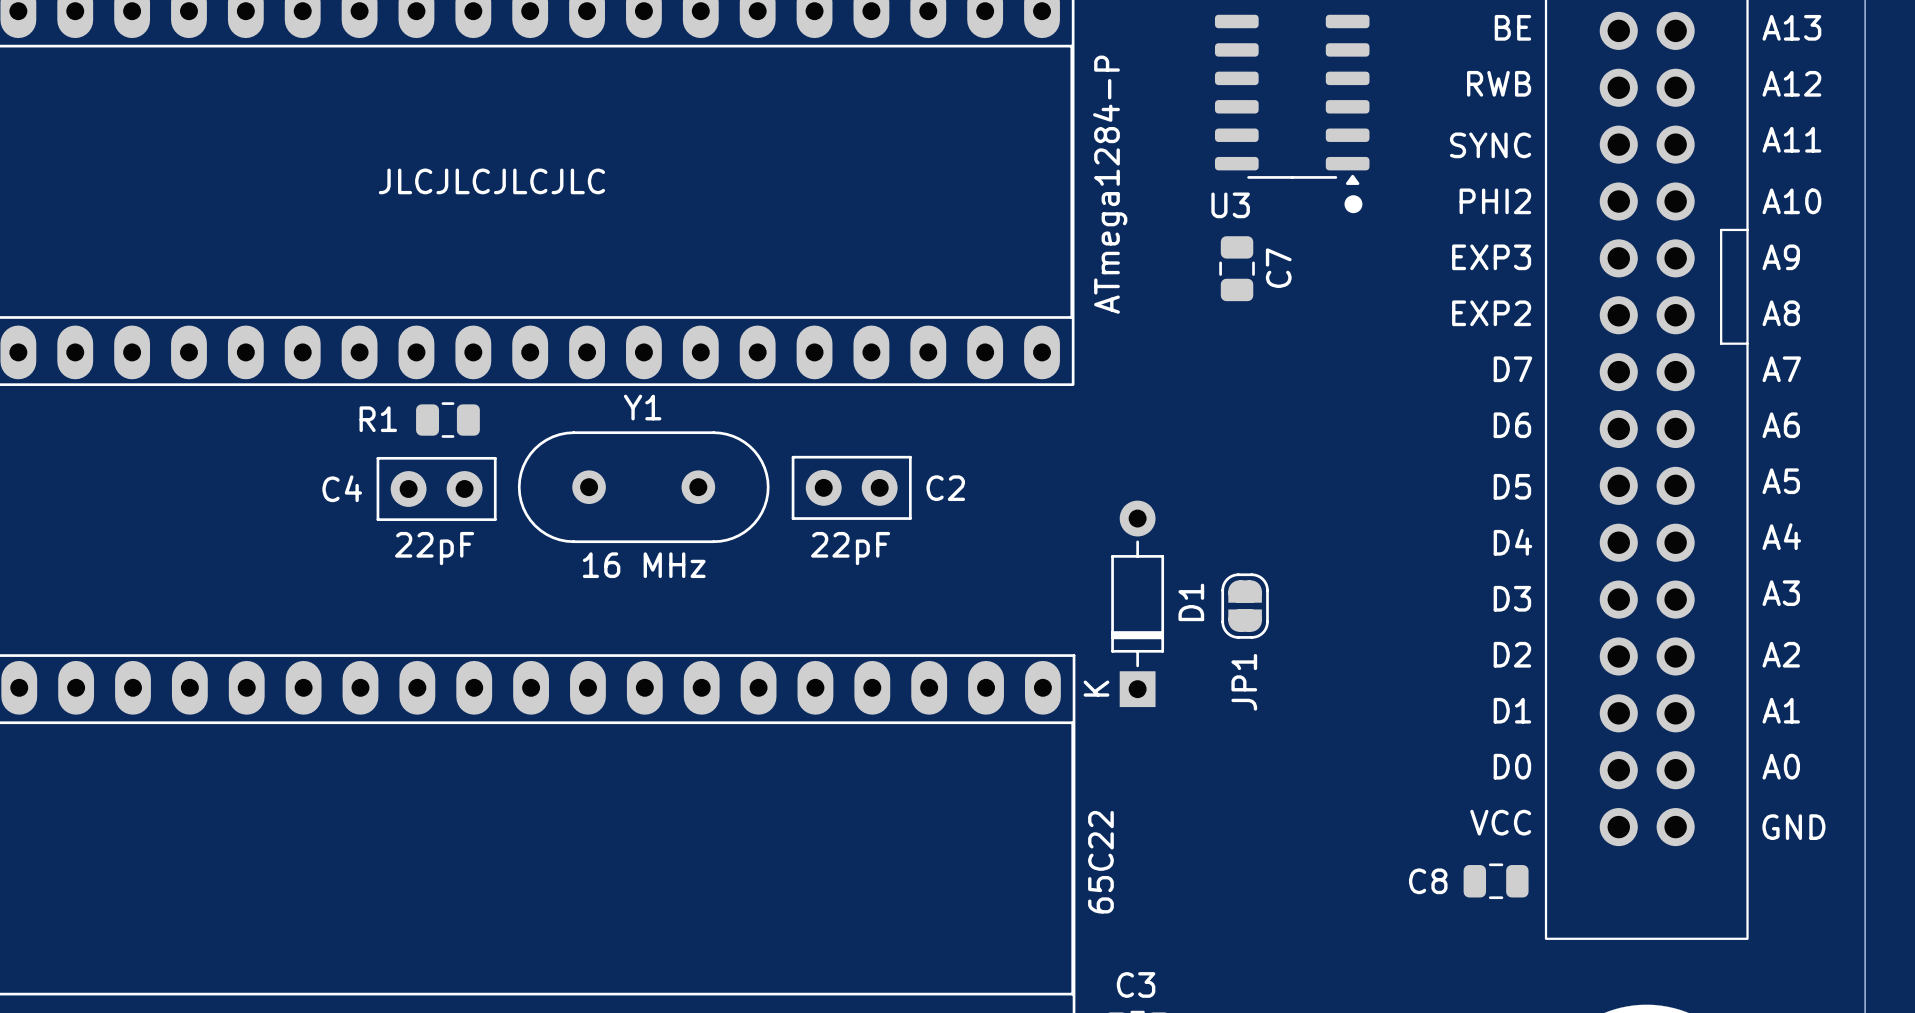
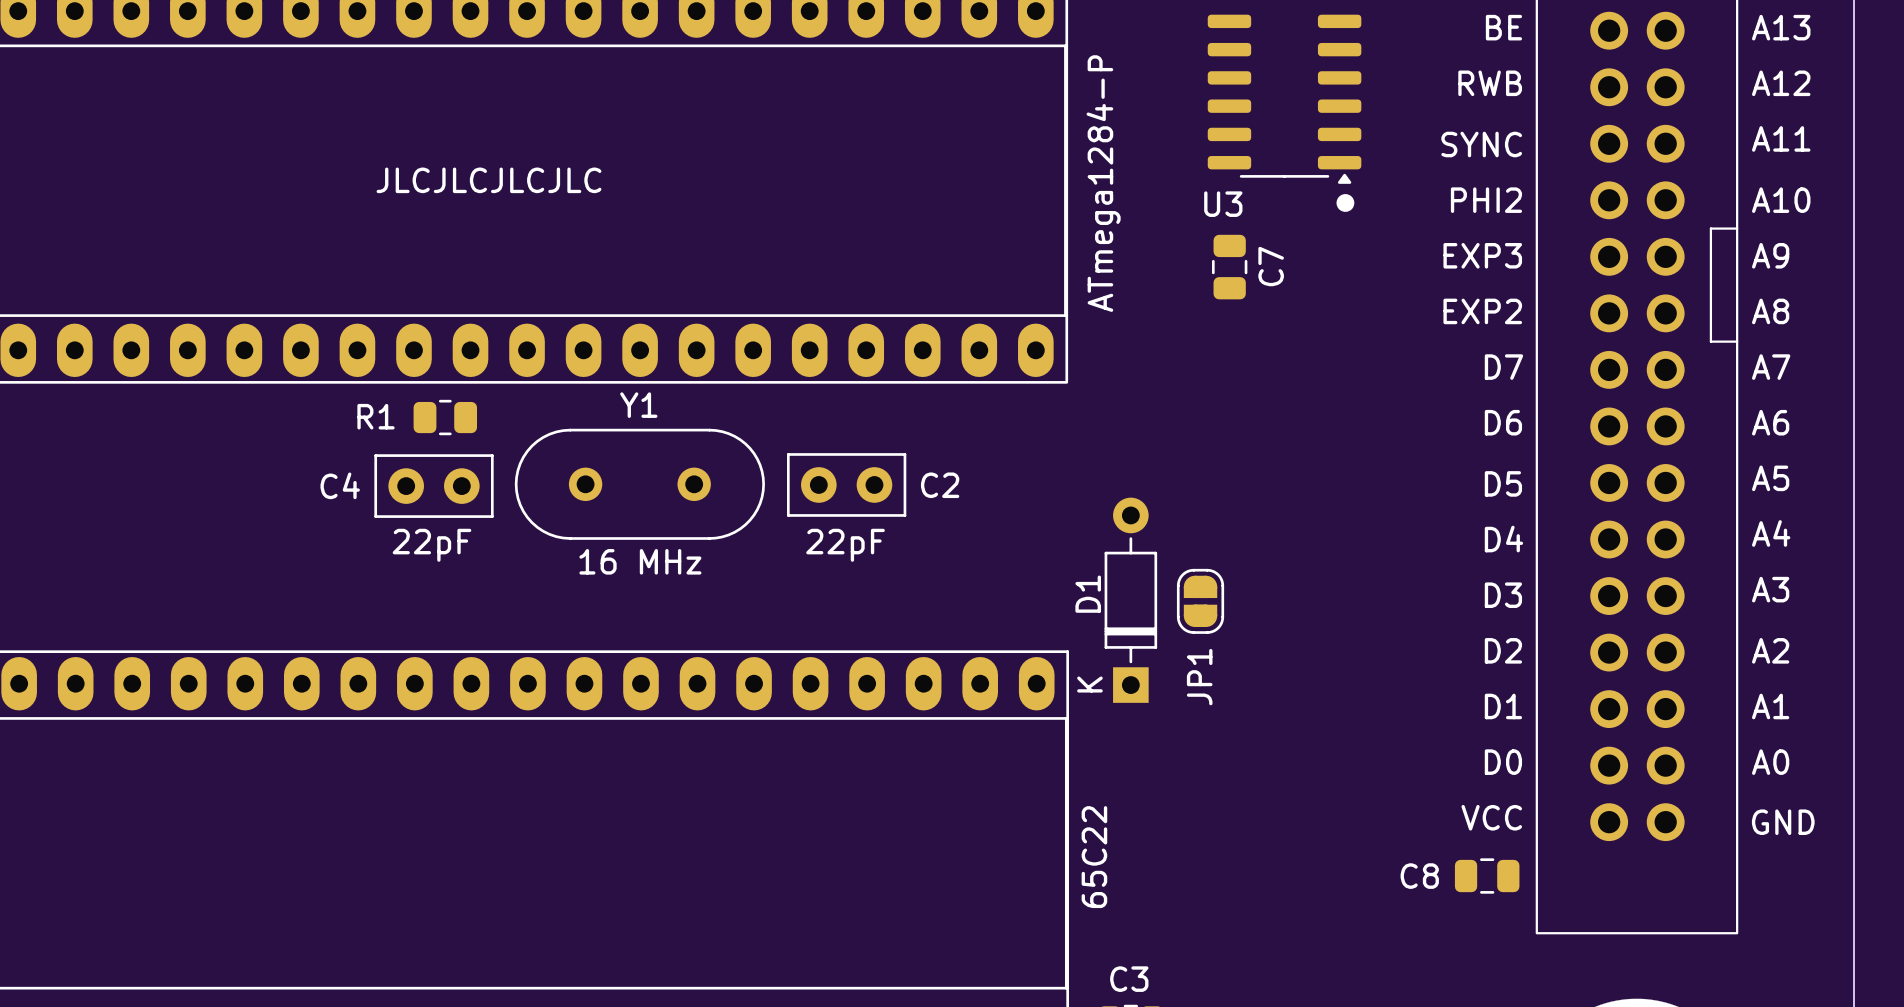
D1 name position: D1 (1191, 602) -> D1 (1088, 594)
JP1 position: (1245, 606) -> (1200, 601)

